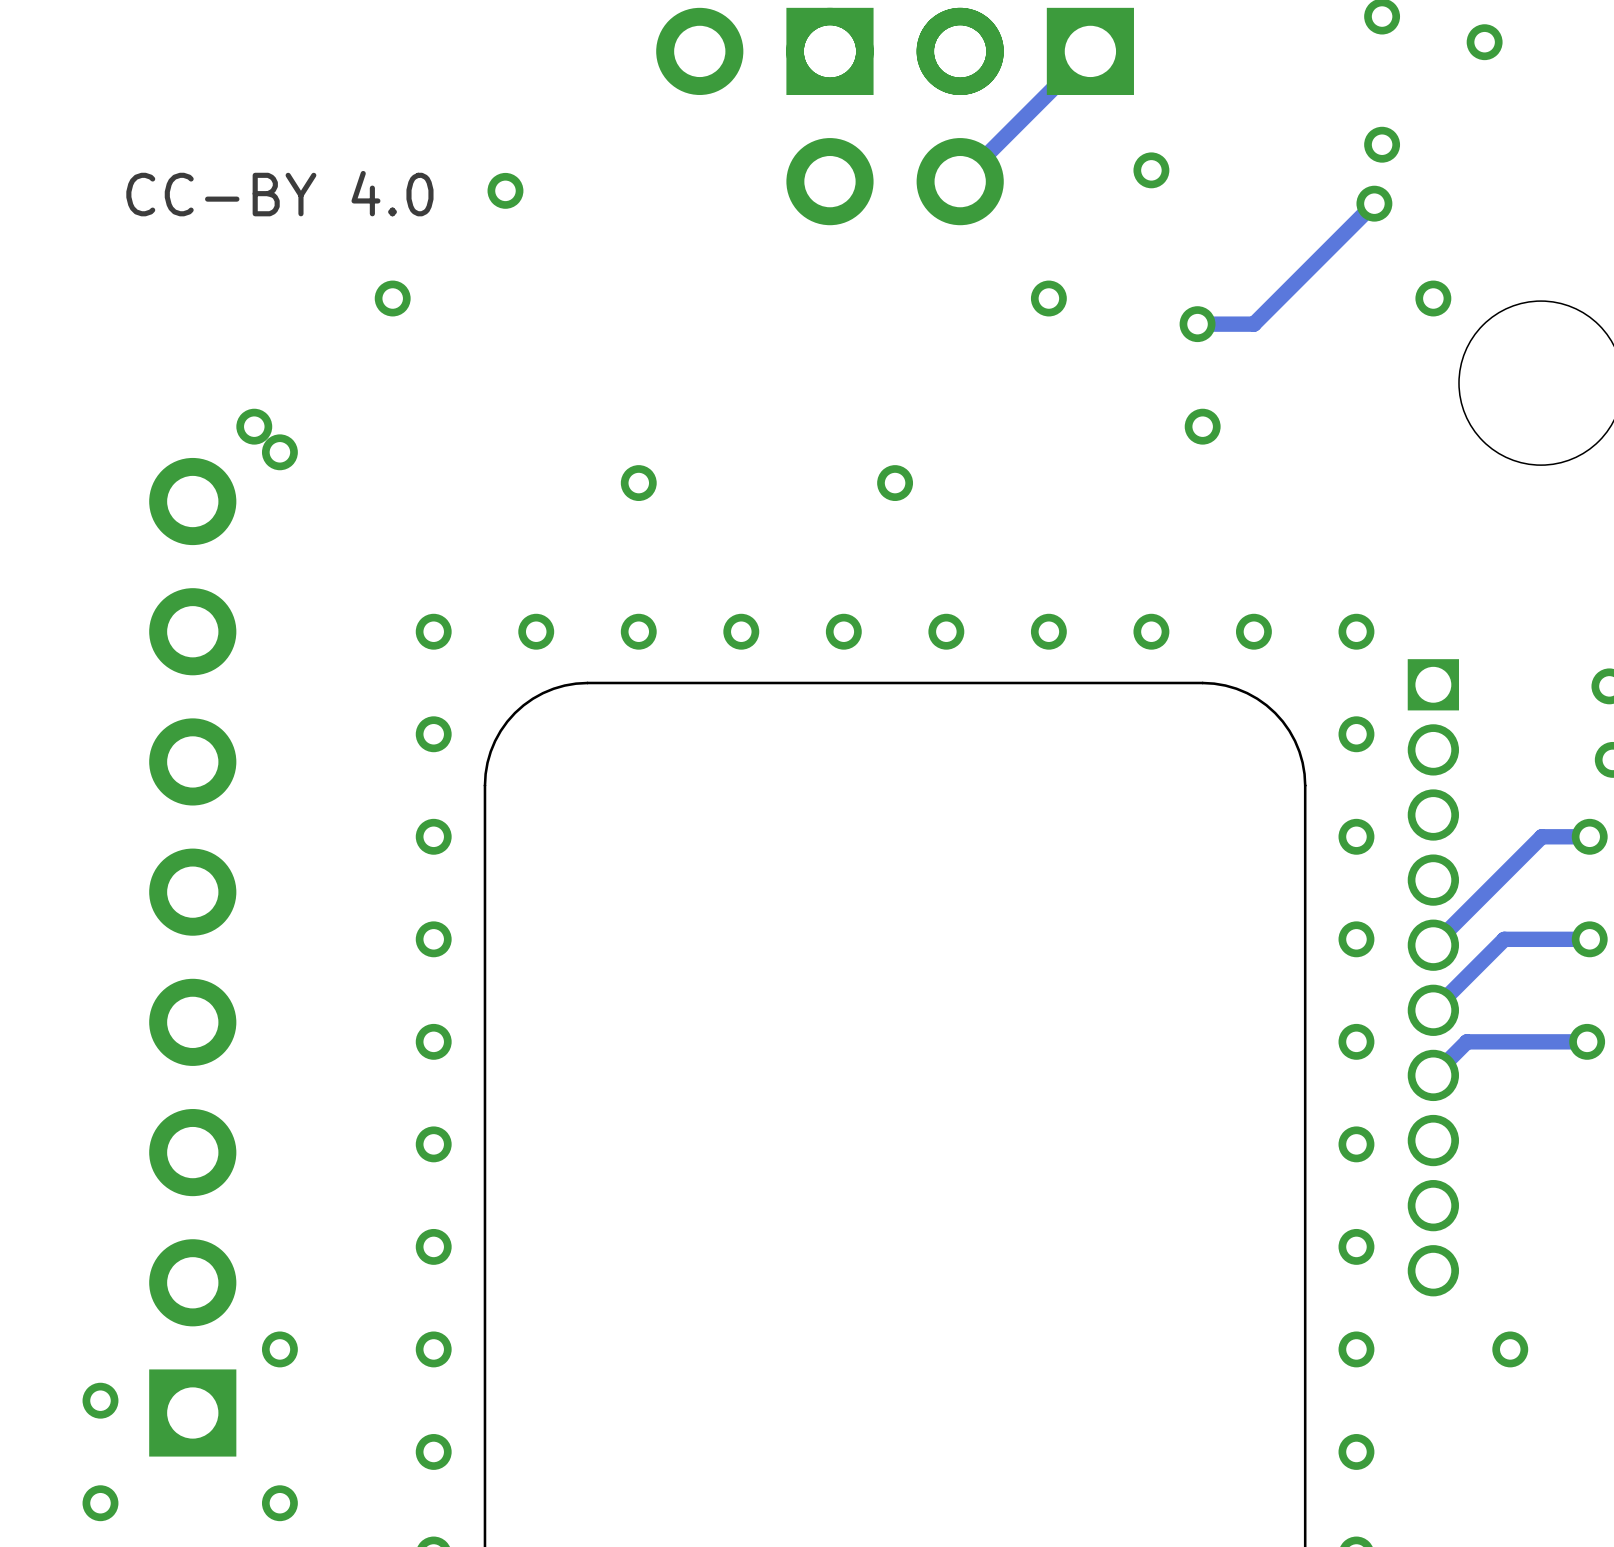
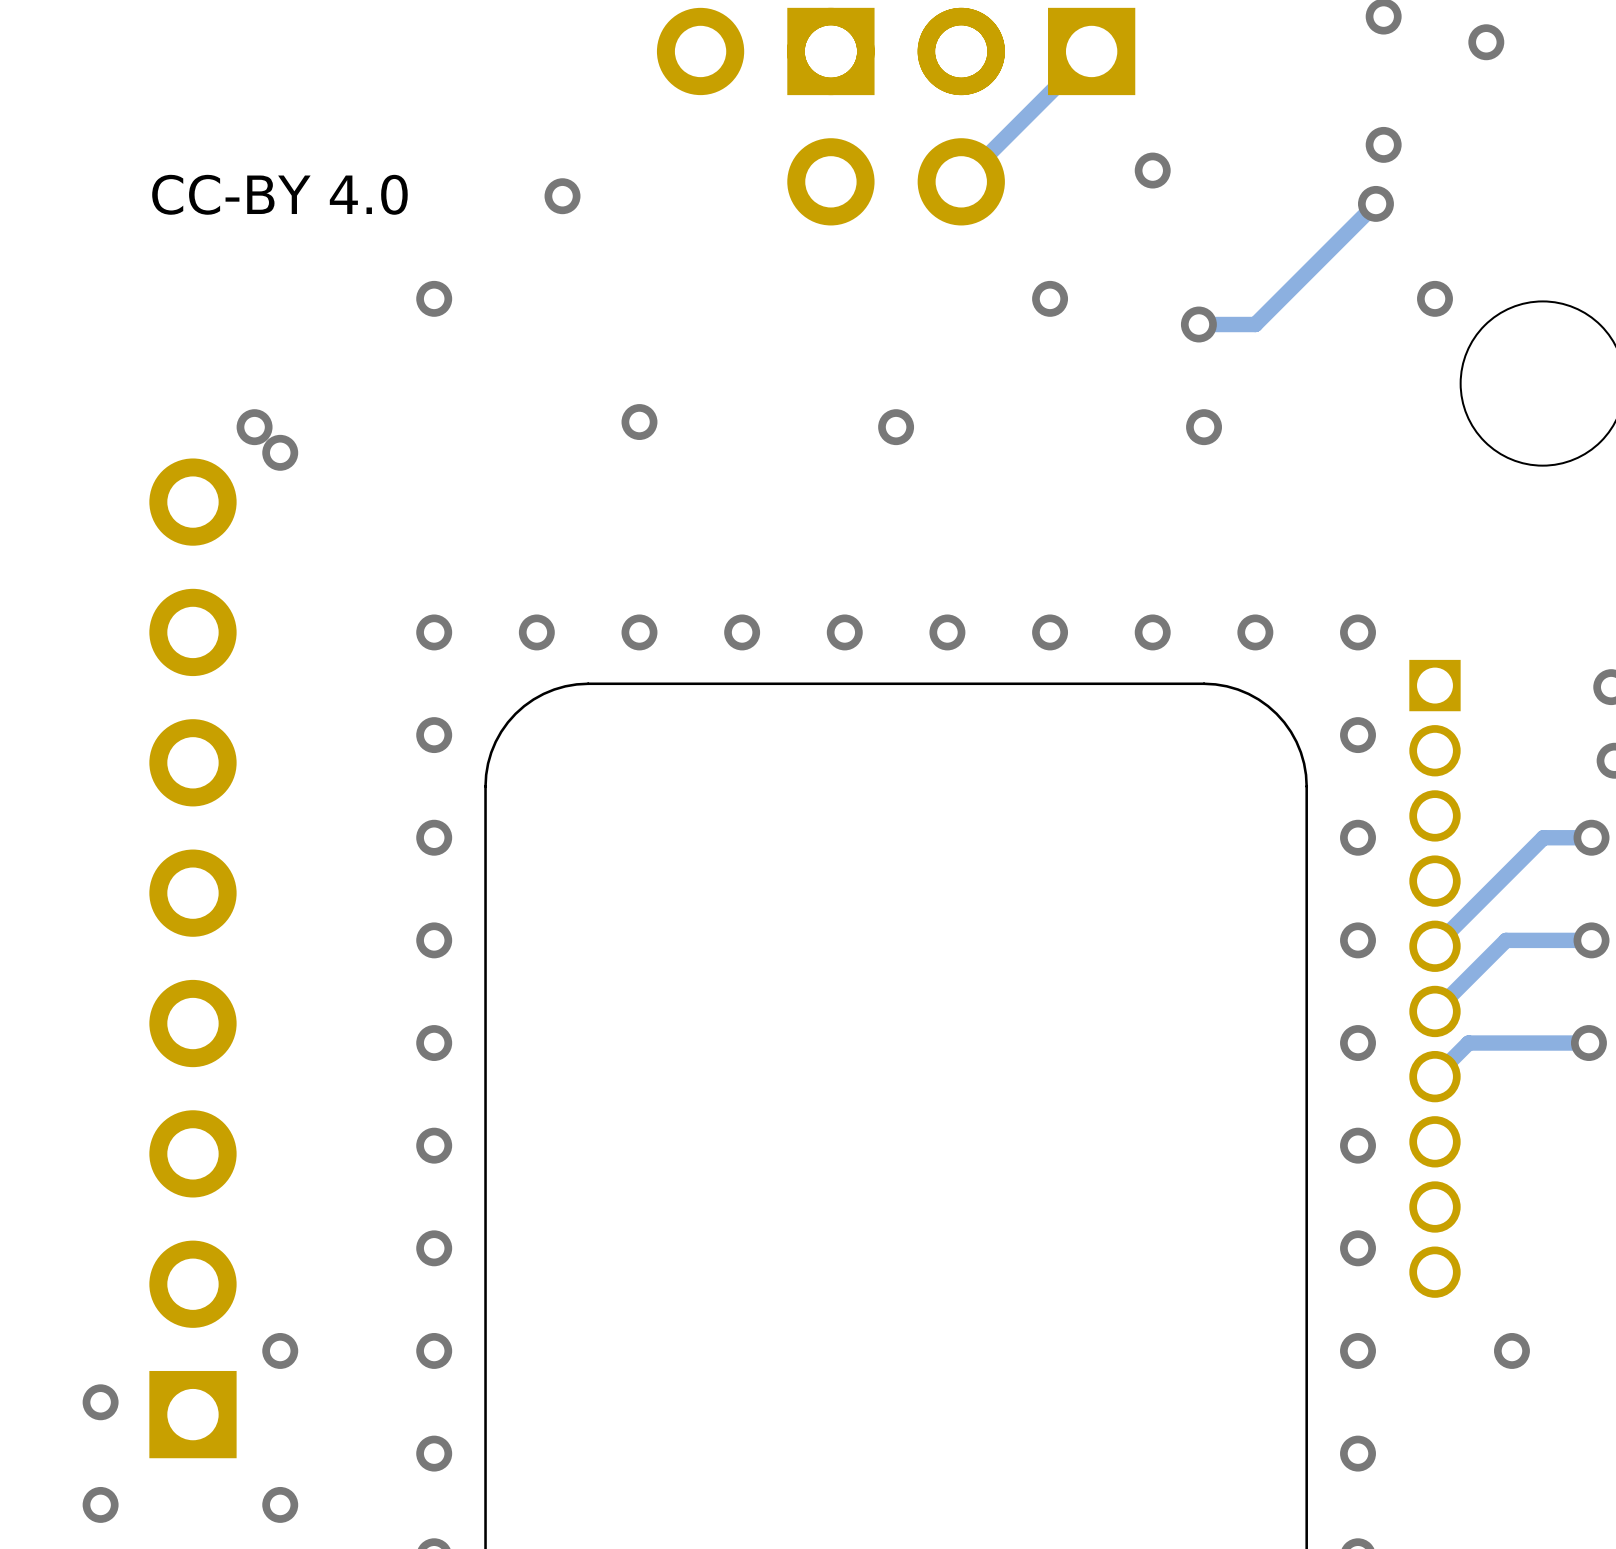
via position: (505, 190) -> (562, 196)
via position: (392, 298) -> (434, 298)
via position: (638, 483) -> (639, 422)
via position: (895, 483) -> (896, 427)

